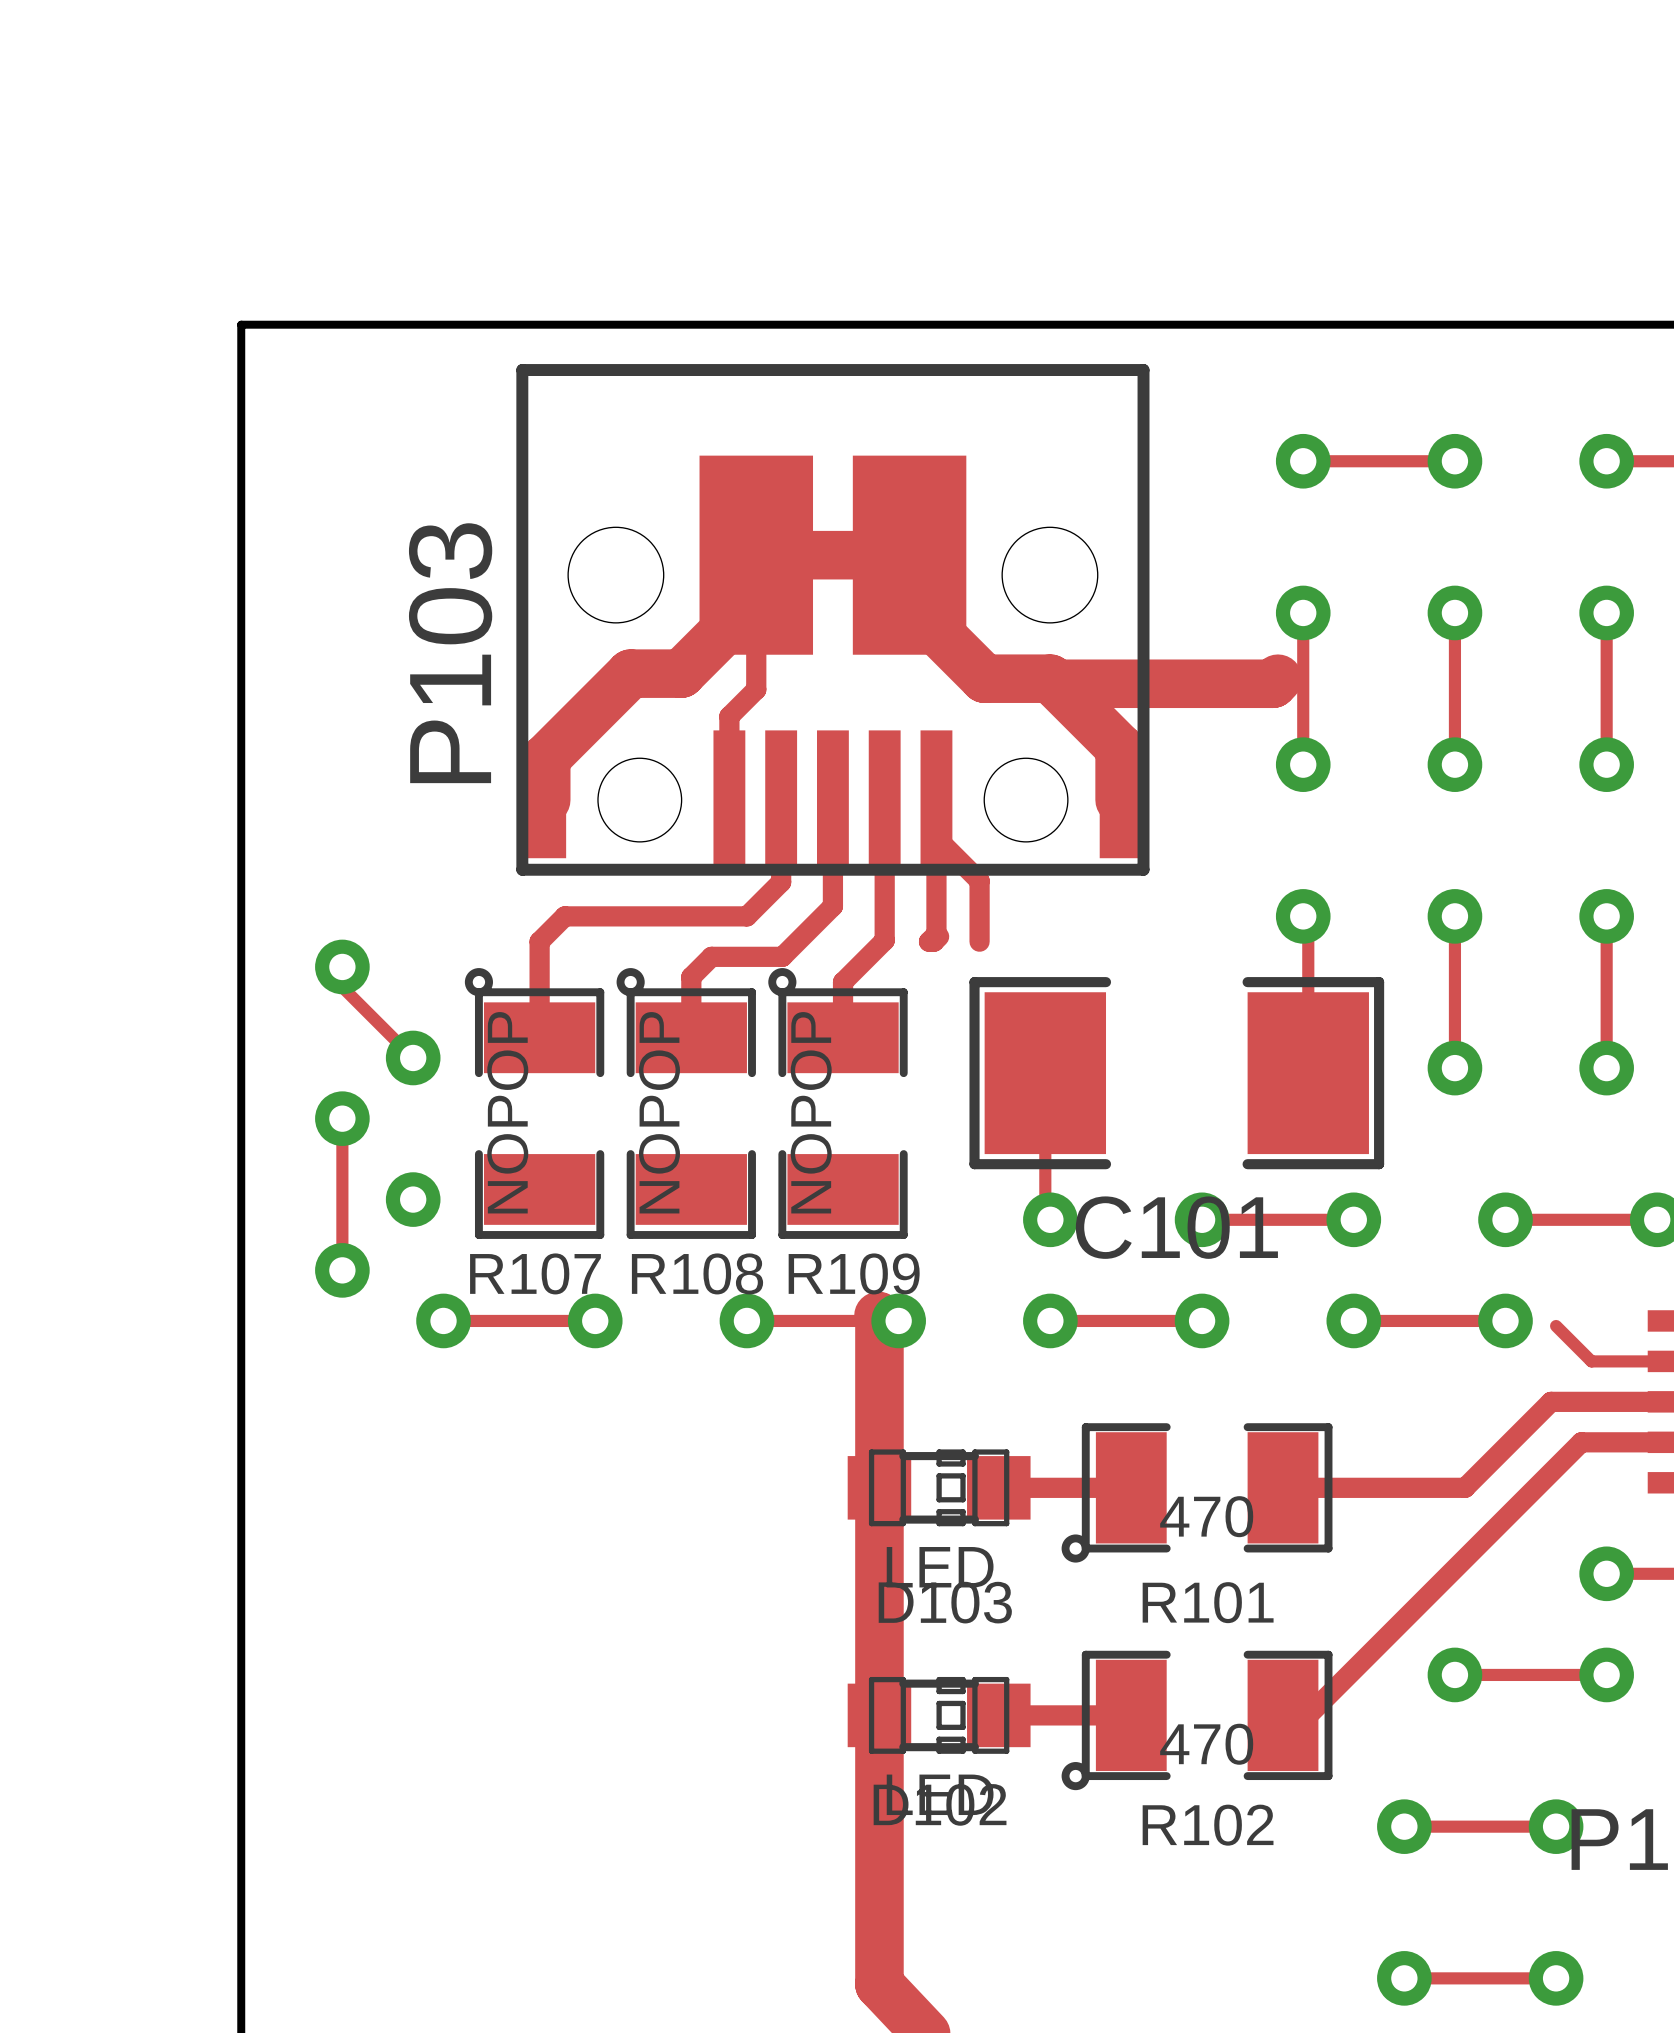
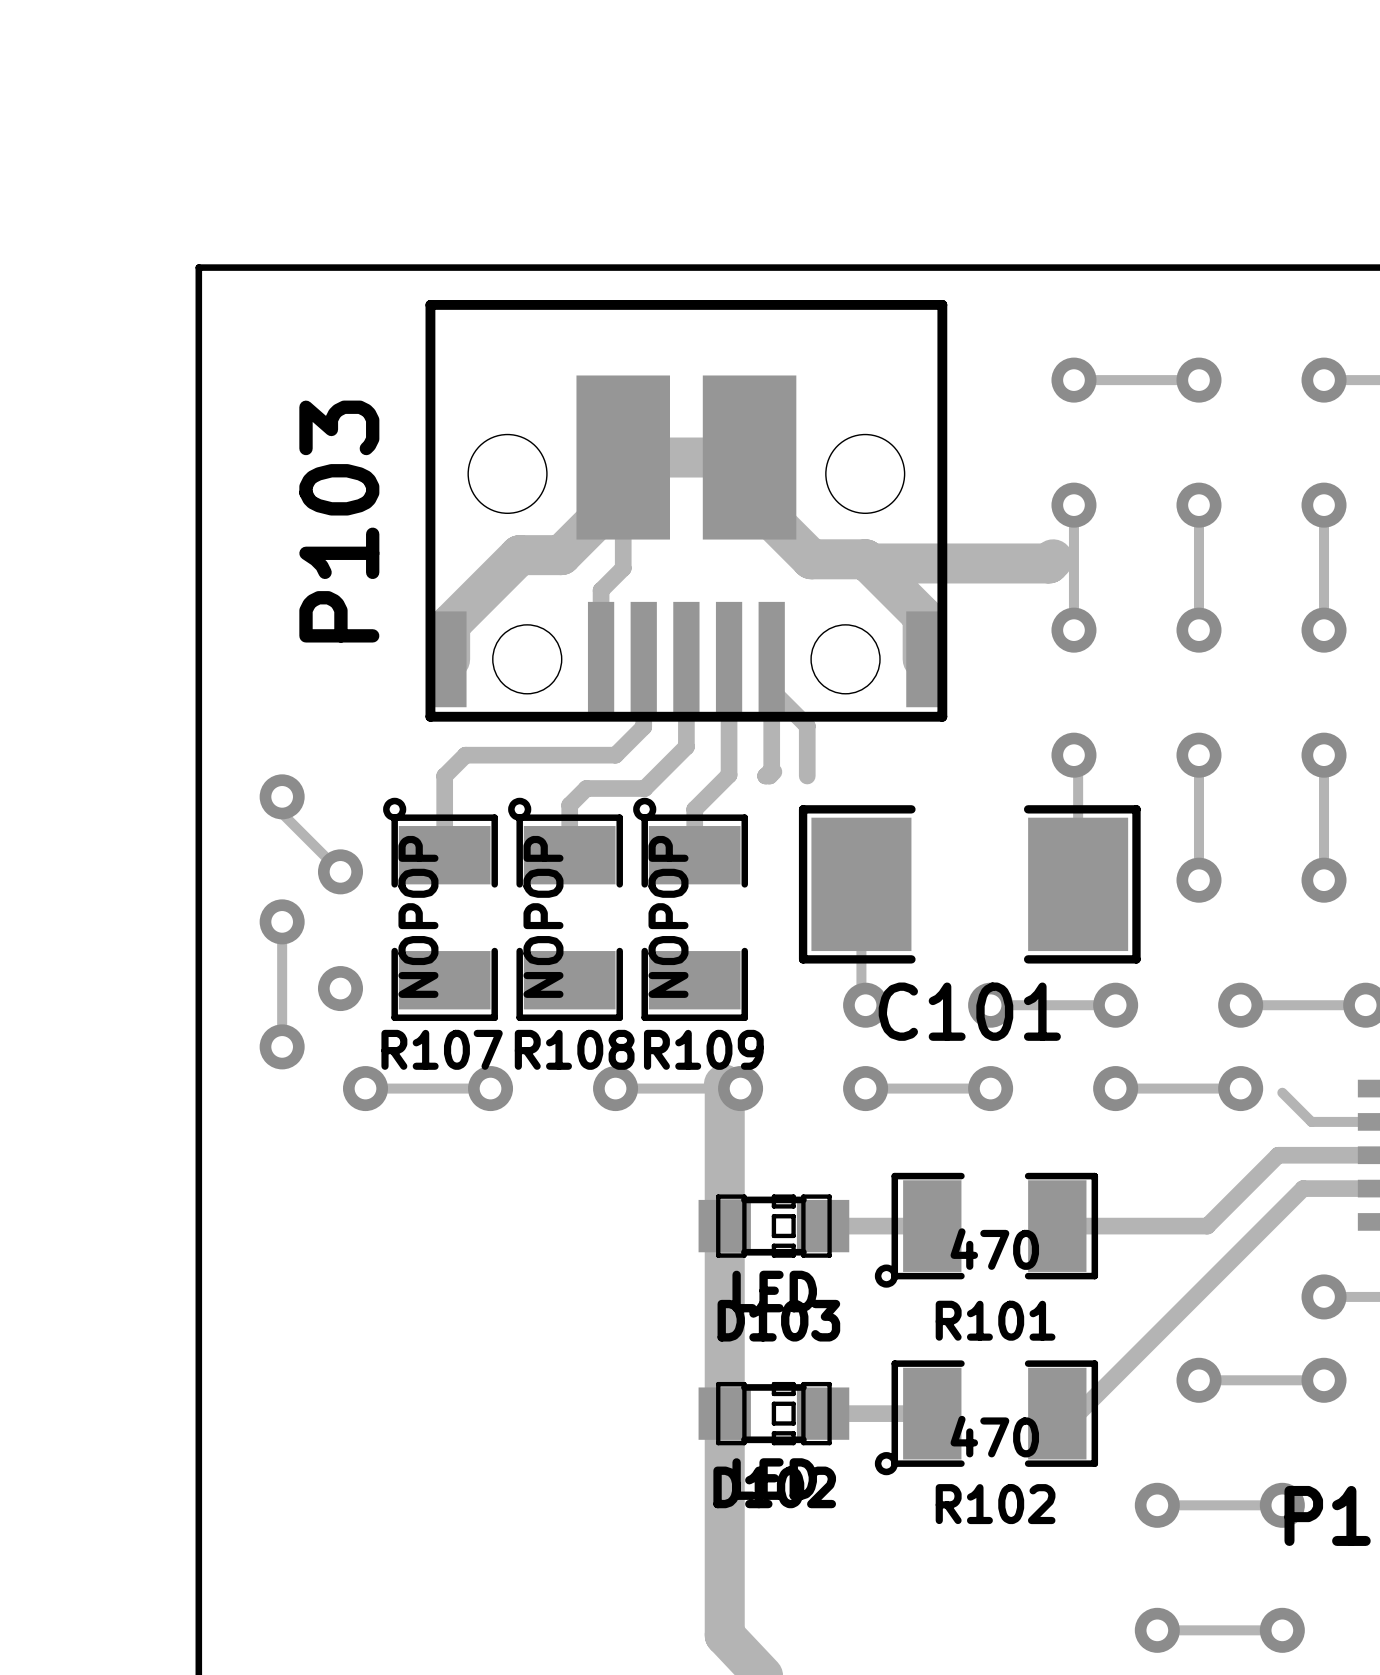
P103 name position: P103 (450, 653) -> P103 (339, 521)

